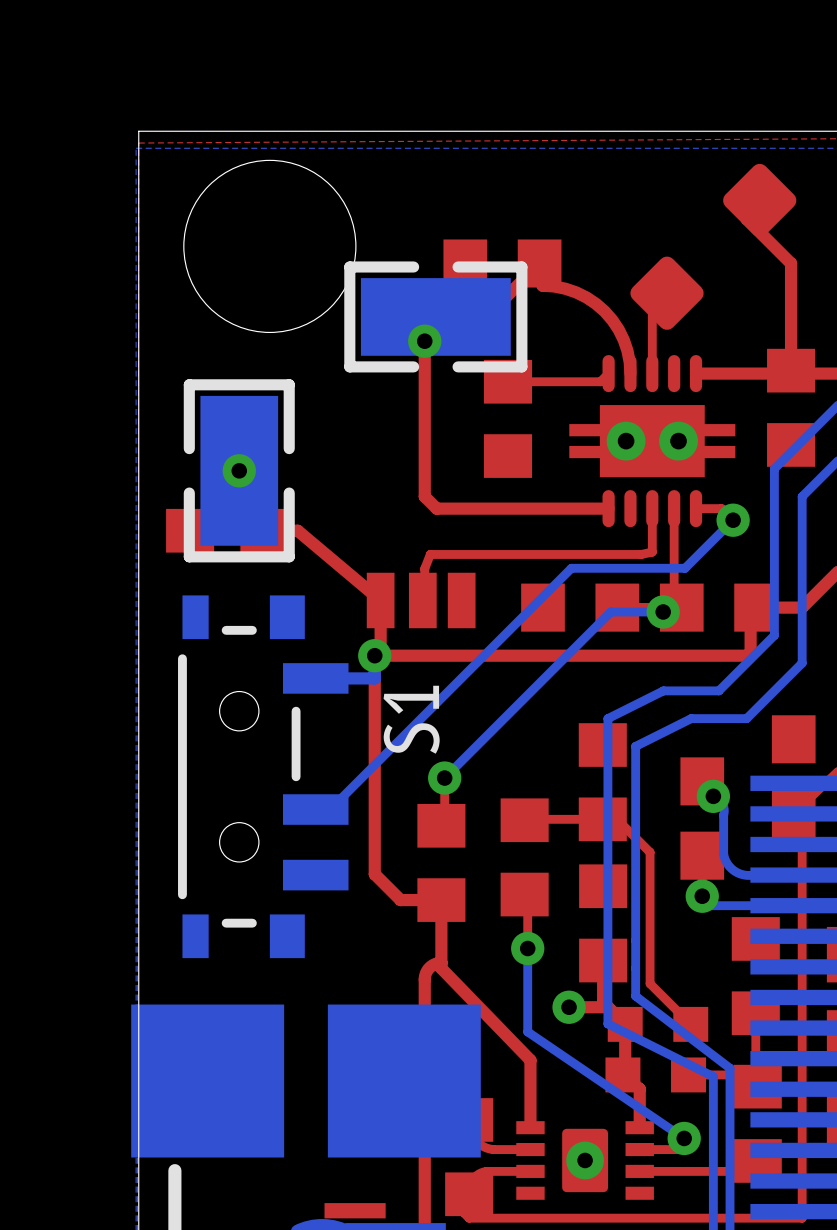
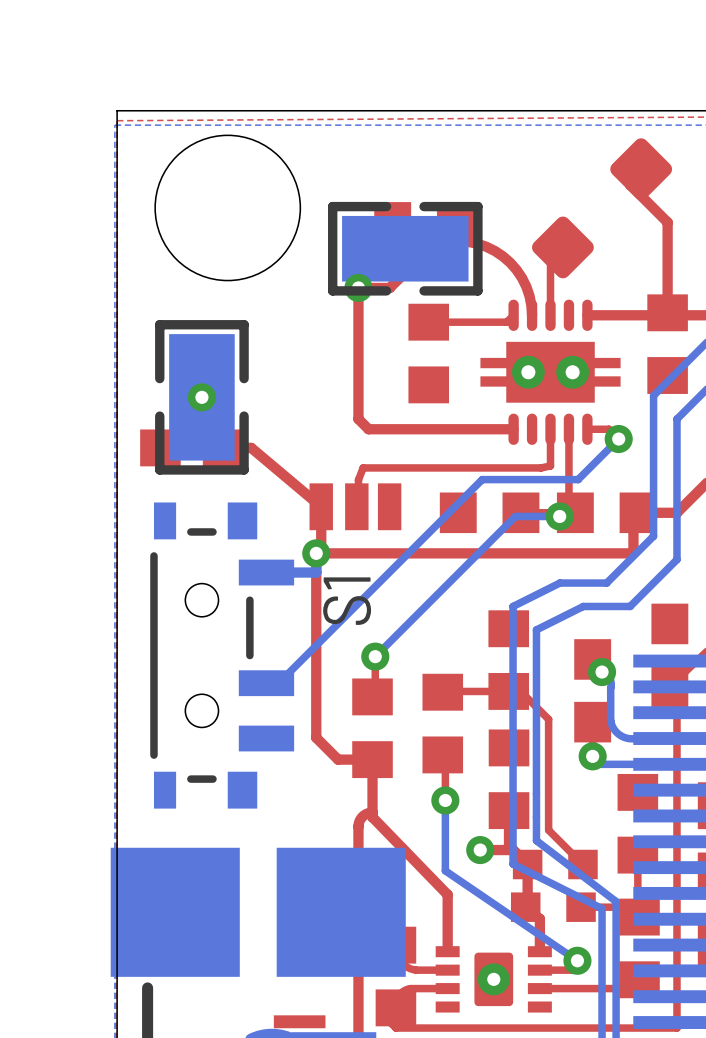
part position: (435, 316) -> (405, 248)

